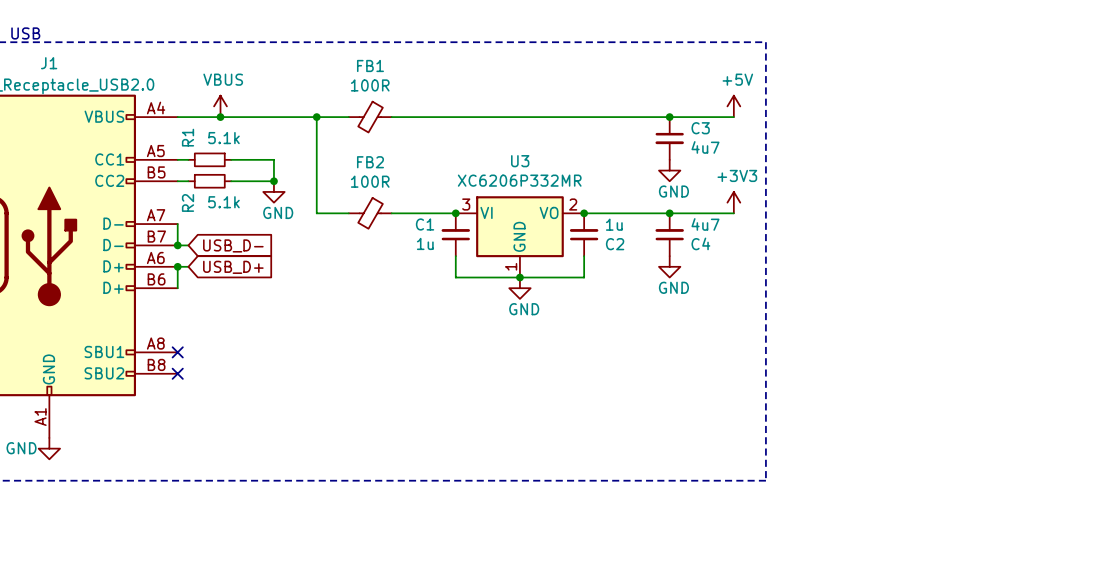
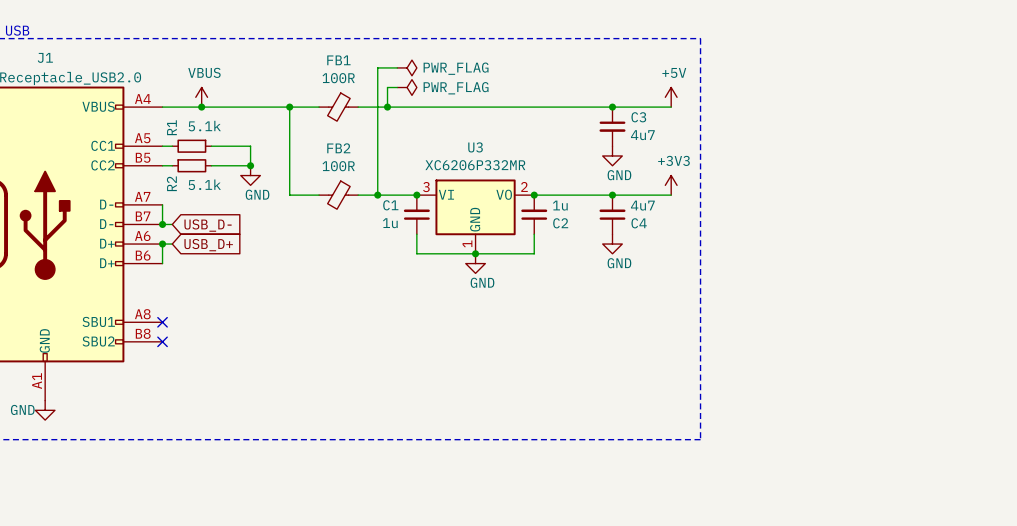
wire: none -> (397, 67) (377, 67) (377, 195)
power symbol: none -> PWR_FLAG (407, 67)
wire: none -> (397, 87) (387, 87) (387, 107)
power symbol: none -> PWR_FLAG (407, 87)
junction: none -> (387, 107)
junction: none -> (377, 195)

